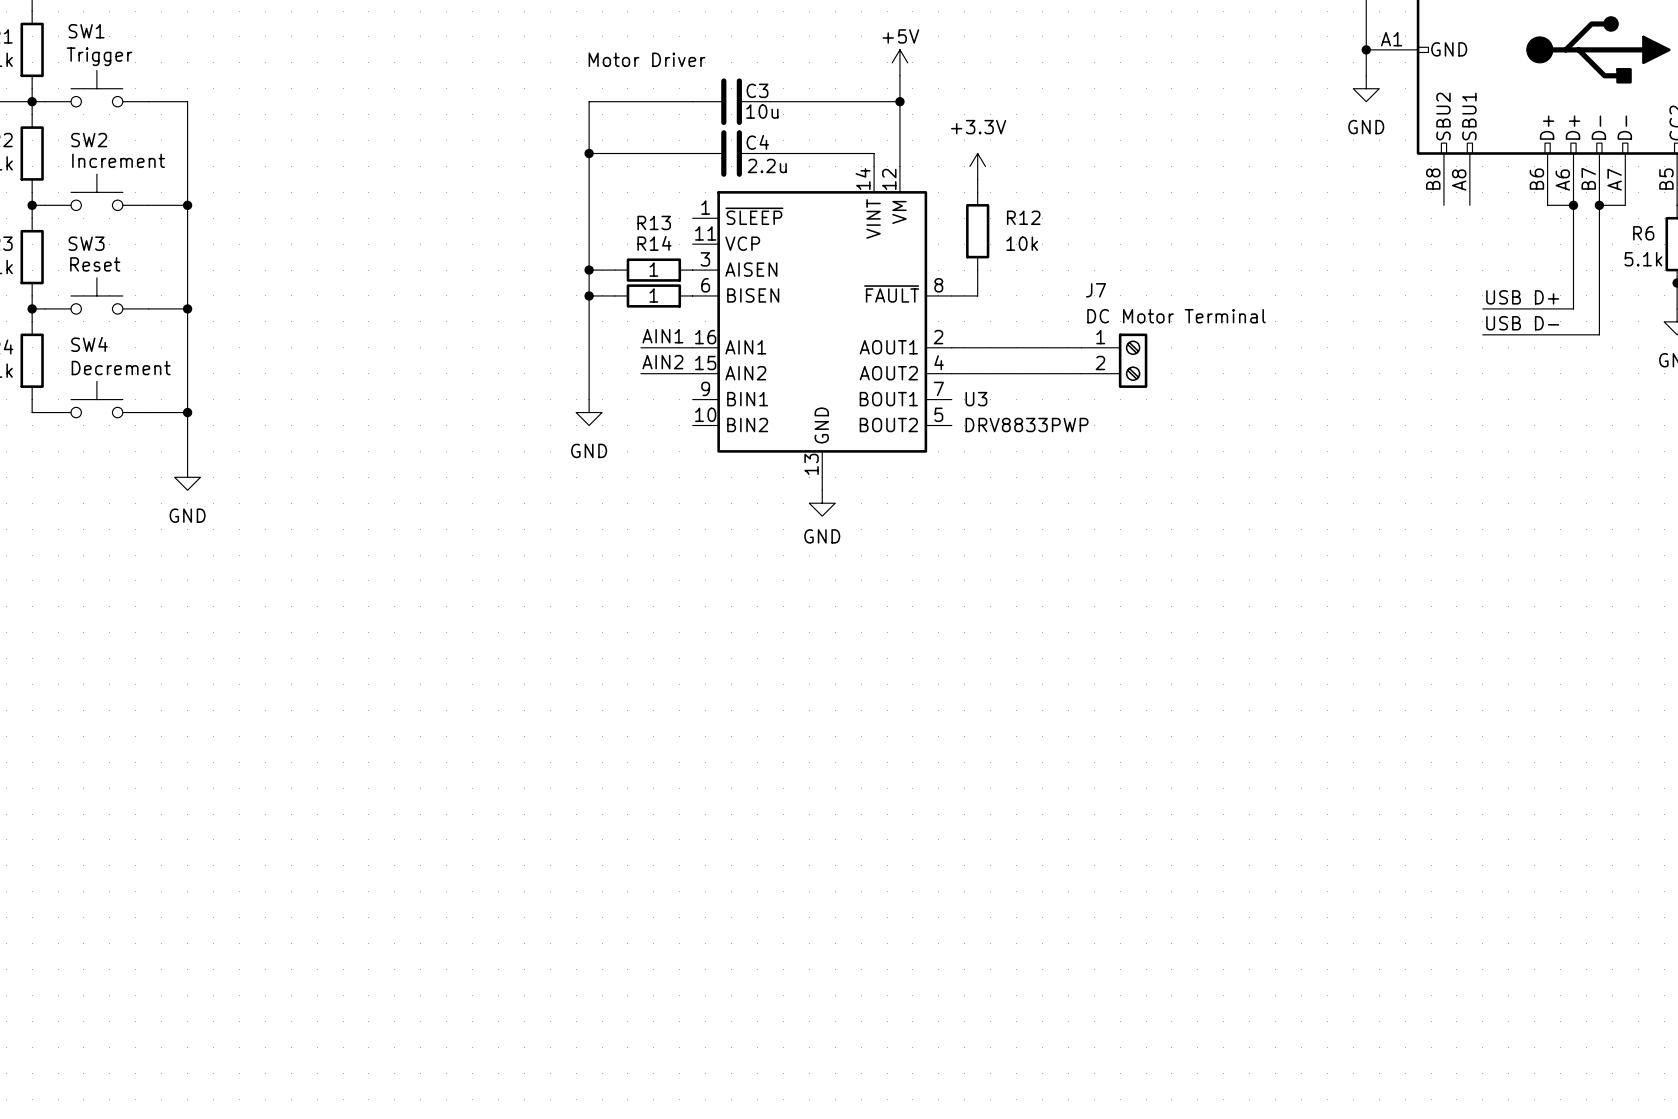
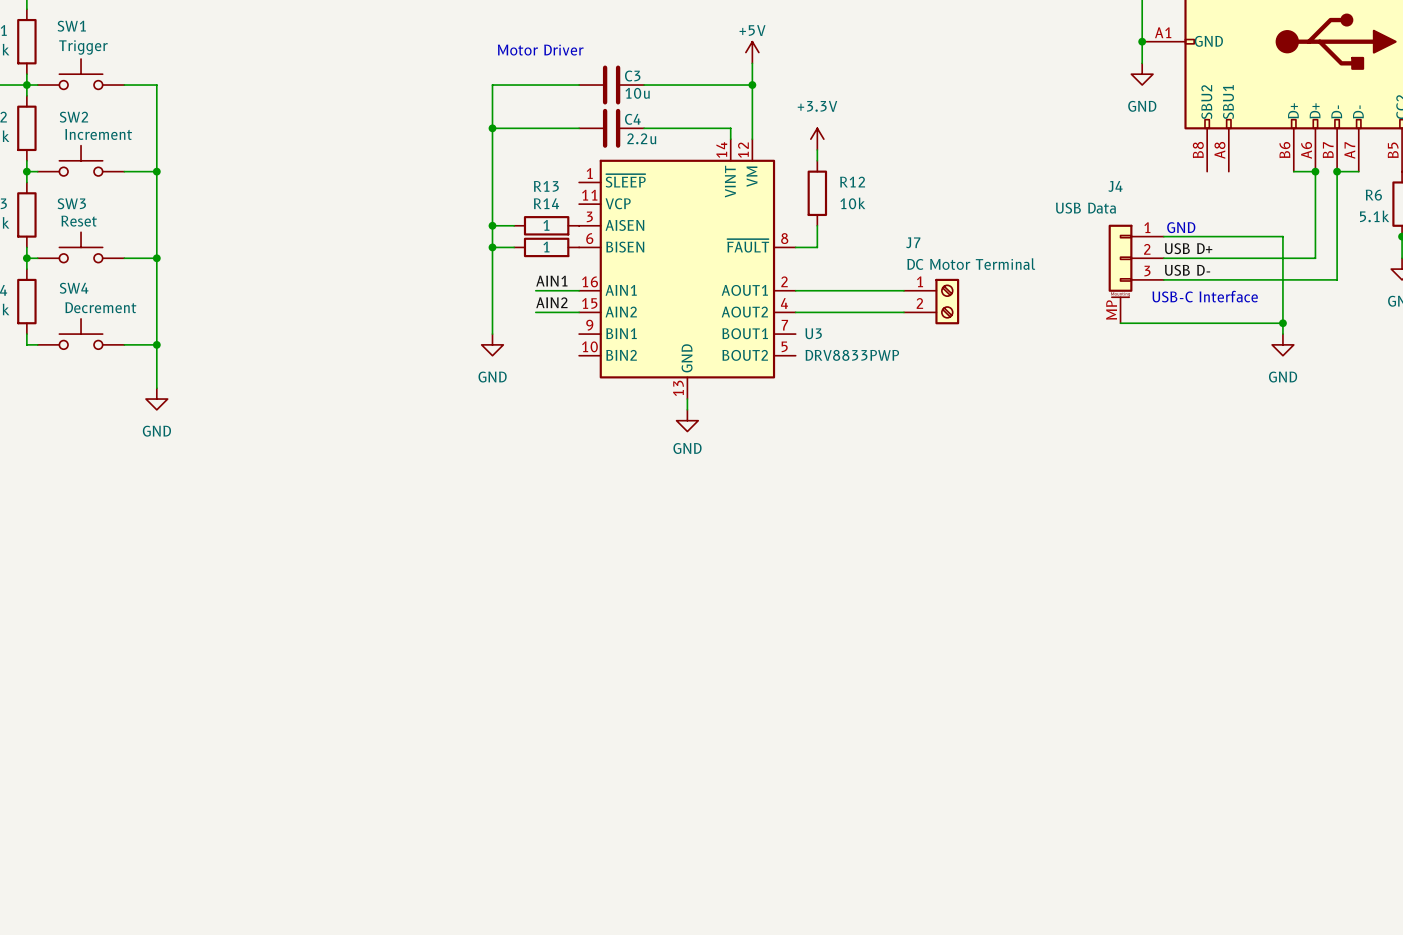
text: none -> GND (1181, 227)
wire: none -> (1163, 236) (1282, 236) (1282, 334)
label position: USB D+ (1522, 297) -> USB D+ (1188, 248)
wire: none -> (1163, 258) (1239, 258)
label position: USB D- (1522, 323) -> USB D- (1187, 270)
J4: none -> USB Data (1136, 273)
wire: none -> (1163, 279) (1239, 279)
text: none -> USB-C Interface (1205, 296)
wire: none -> (1120, 323) (1282, 323)
junction: none -> (1282, 323)
power symbol: none -> GND (1282, 344)

